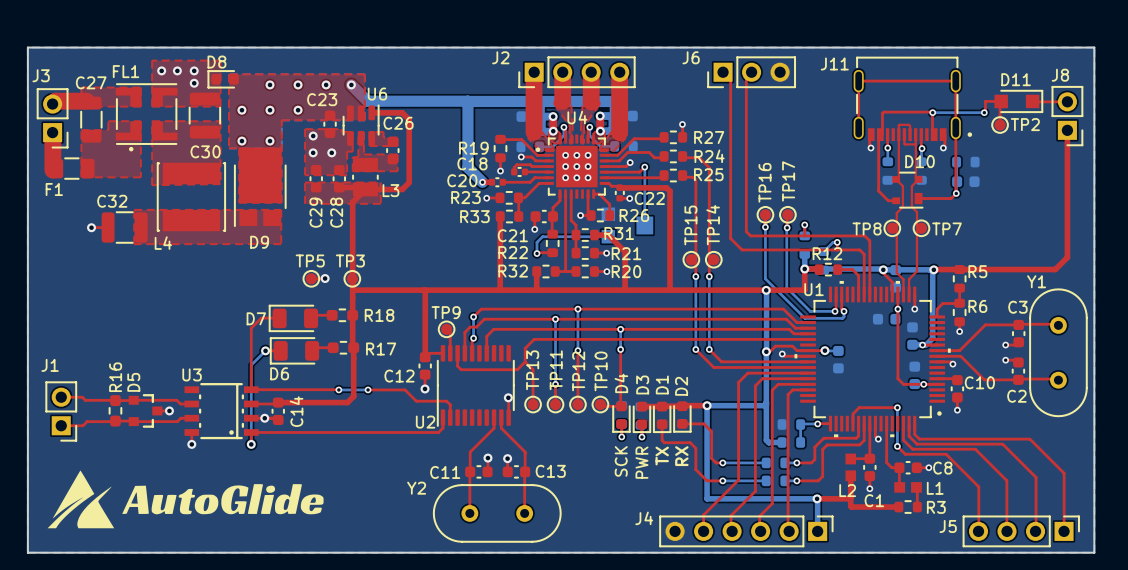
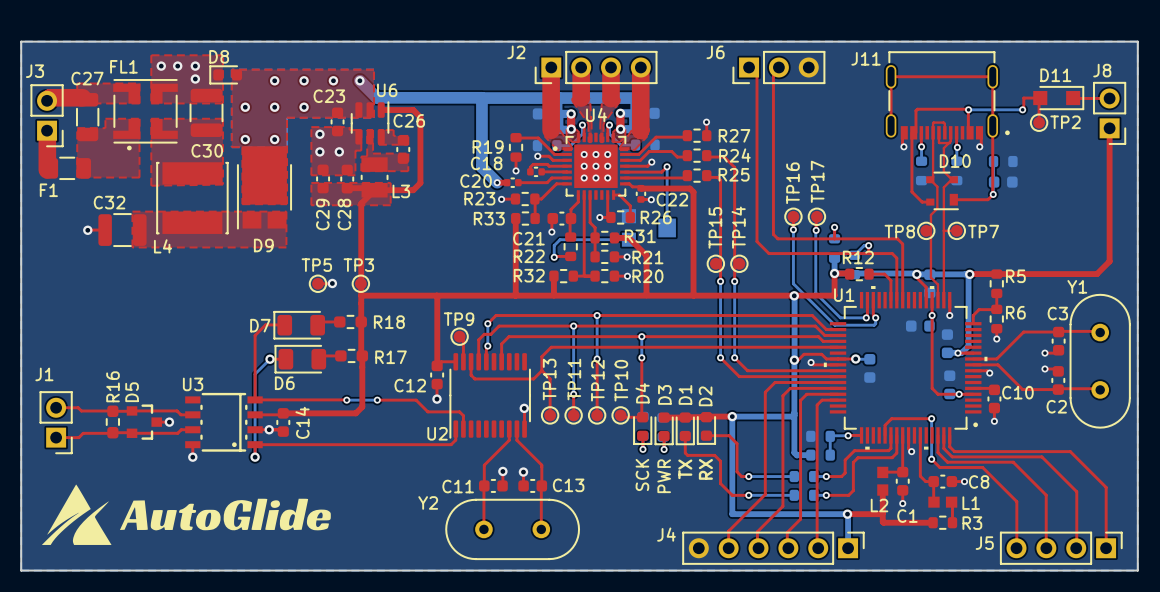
top track: (915, 134) (915, 176) (918, 179) (911, 186) (911, 206) (916, 212) (916, 271) (909, 279) -> (953, 179) (943, 187) (943, 284)
top track: none -> (950, 132) (950, 141) (943, 148) (943, 171) (952, 179)
top track: none -> (943, 230) (953, 230)

